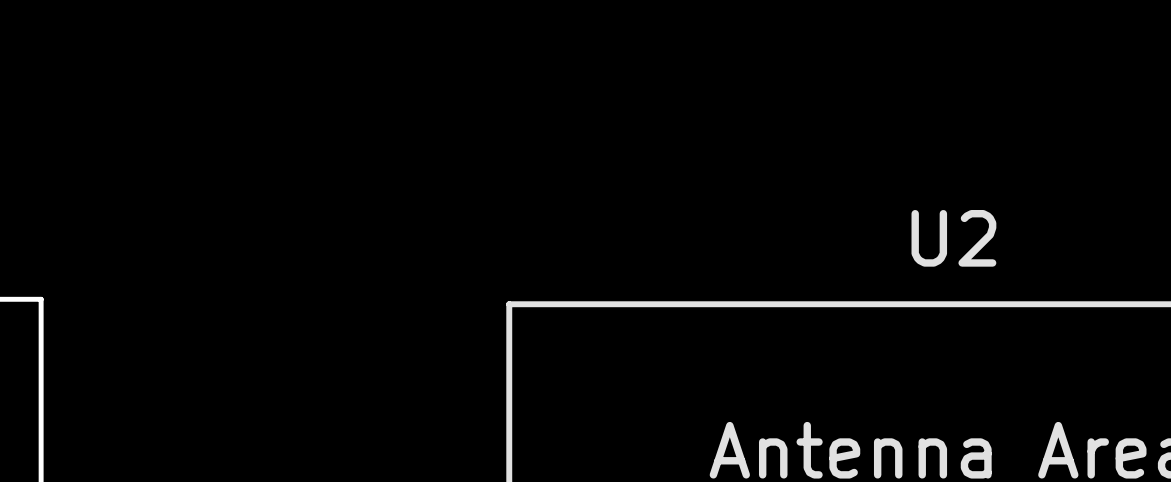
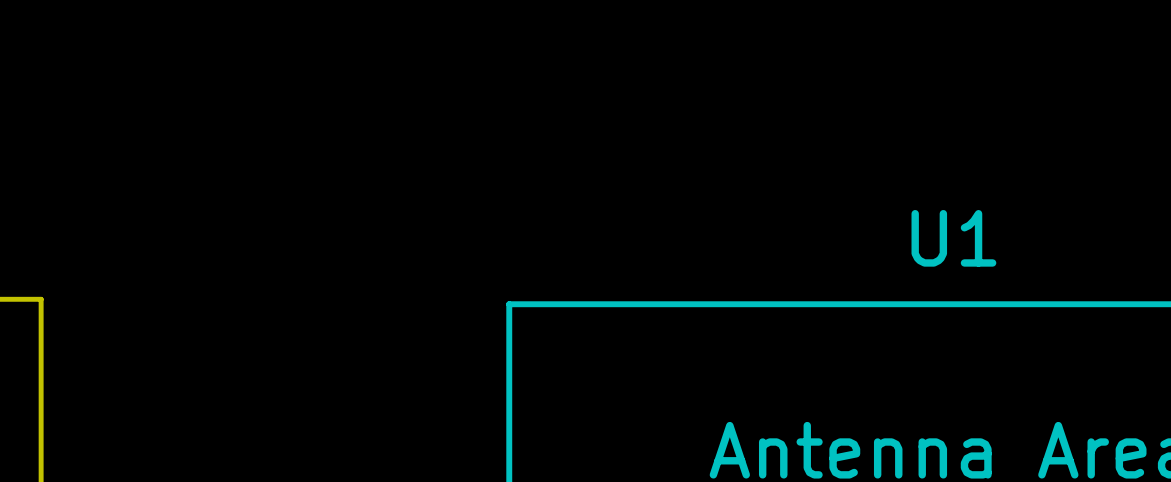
U2 name: U2 (953, 238) -> U1 (953, 238)

